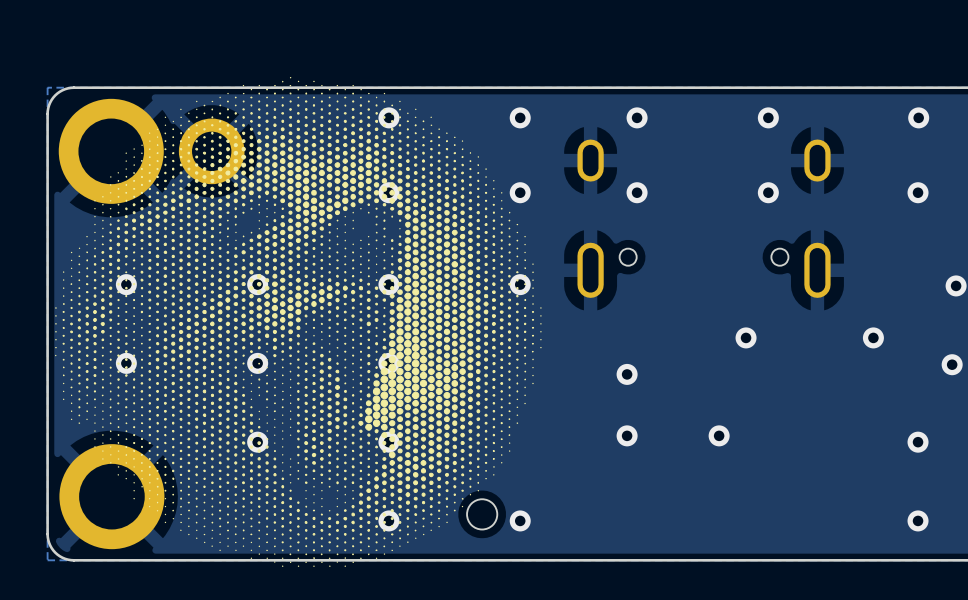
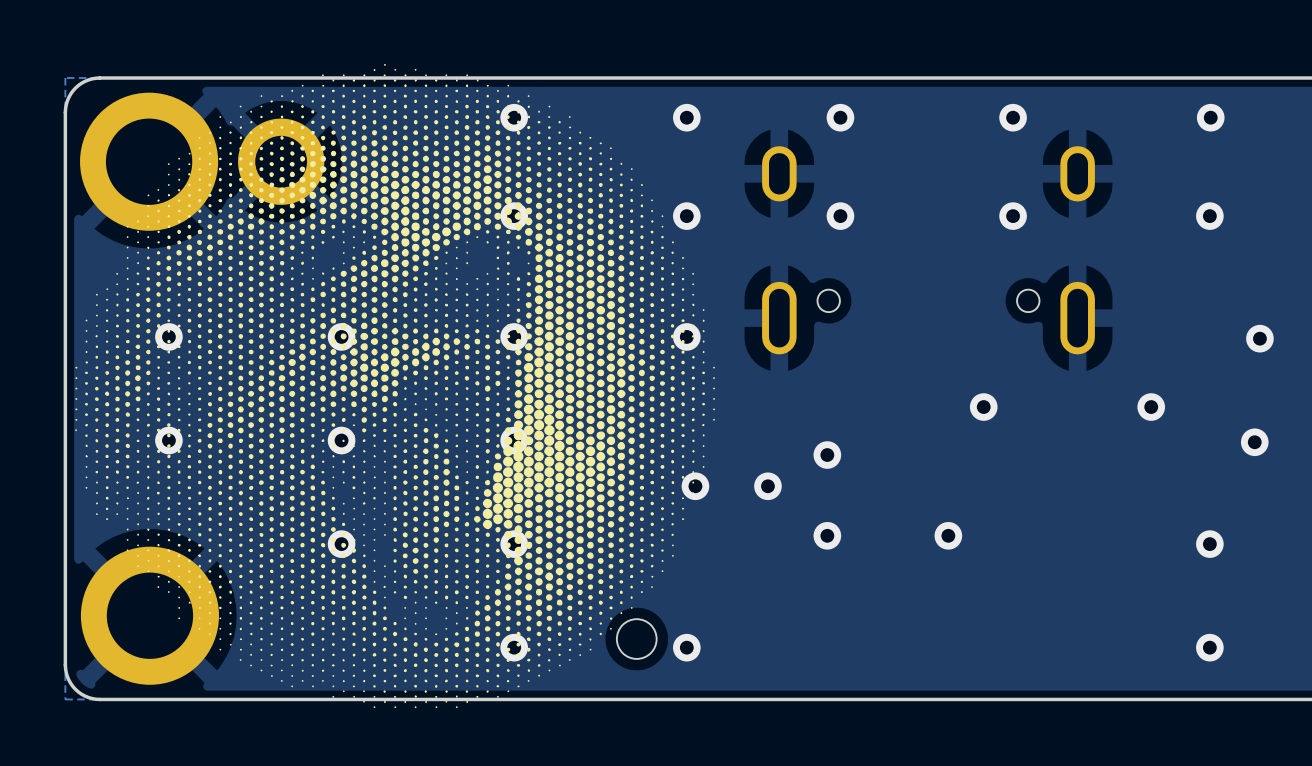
via: none -> (695, 486)
via: none -> (767, 486)

